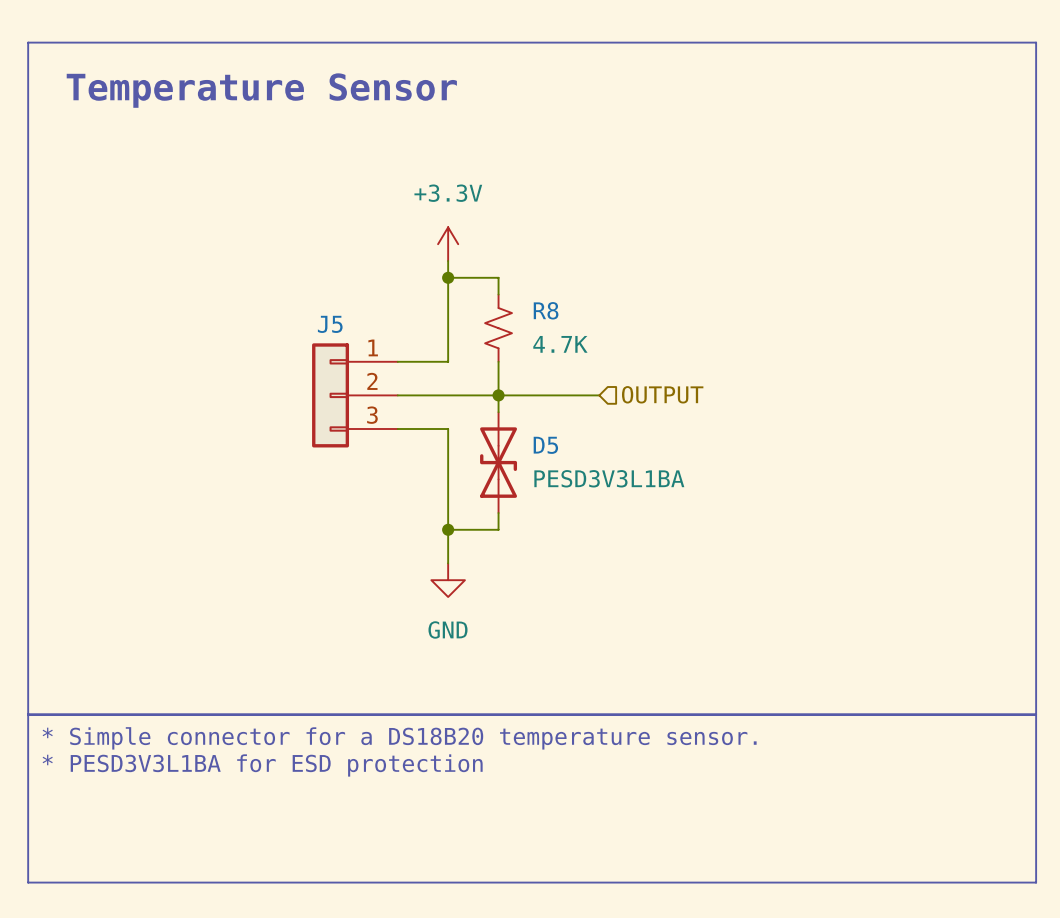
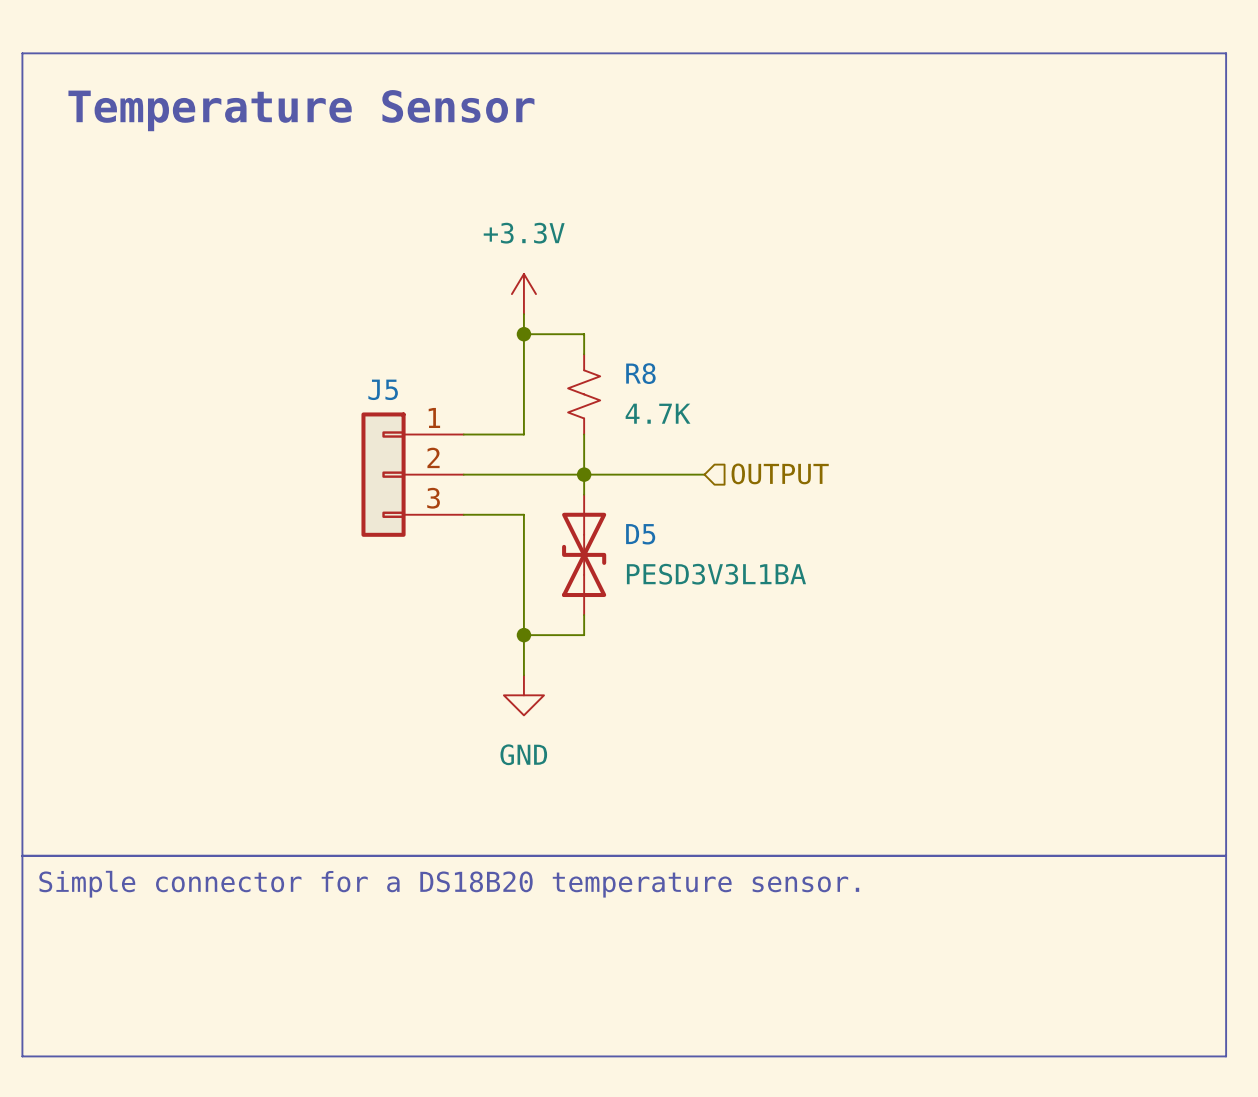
text: * Simple connector for a DS18B20 temperature sensor. (399, 738) -> Simple connector for a DS18B20 temperature sensor. (449, 884)
text: * PESD3V3L1BA for ESD protection (262, 765) -> none

